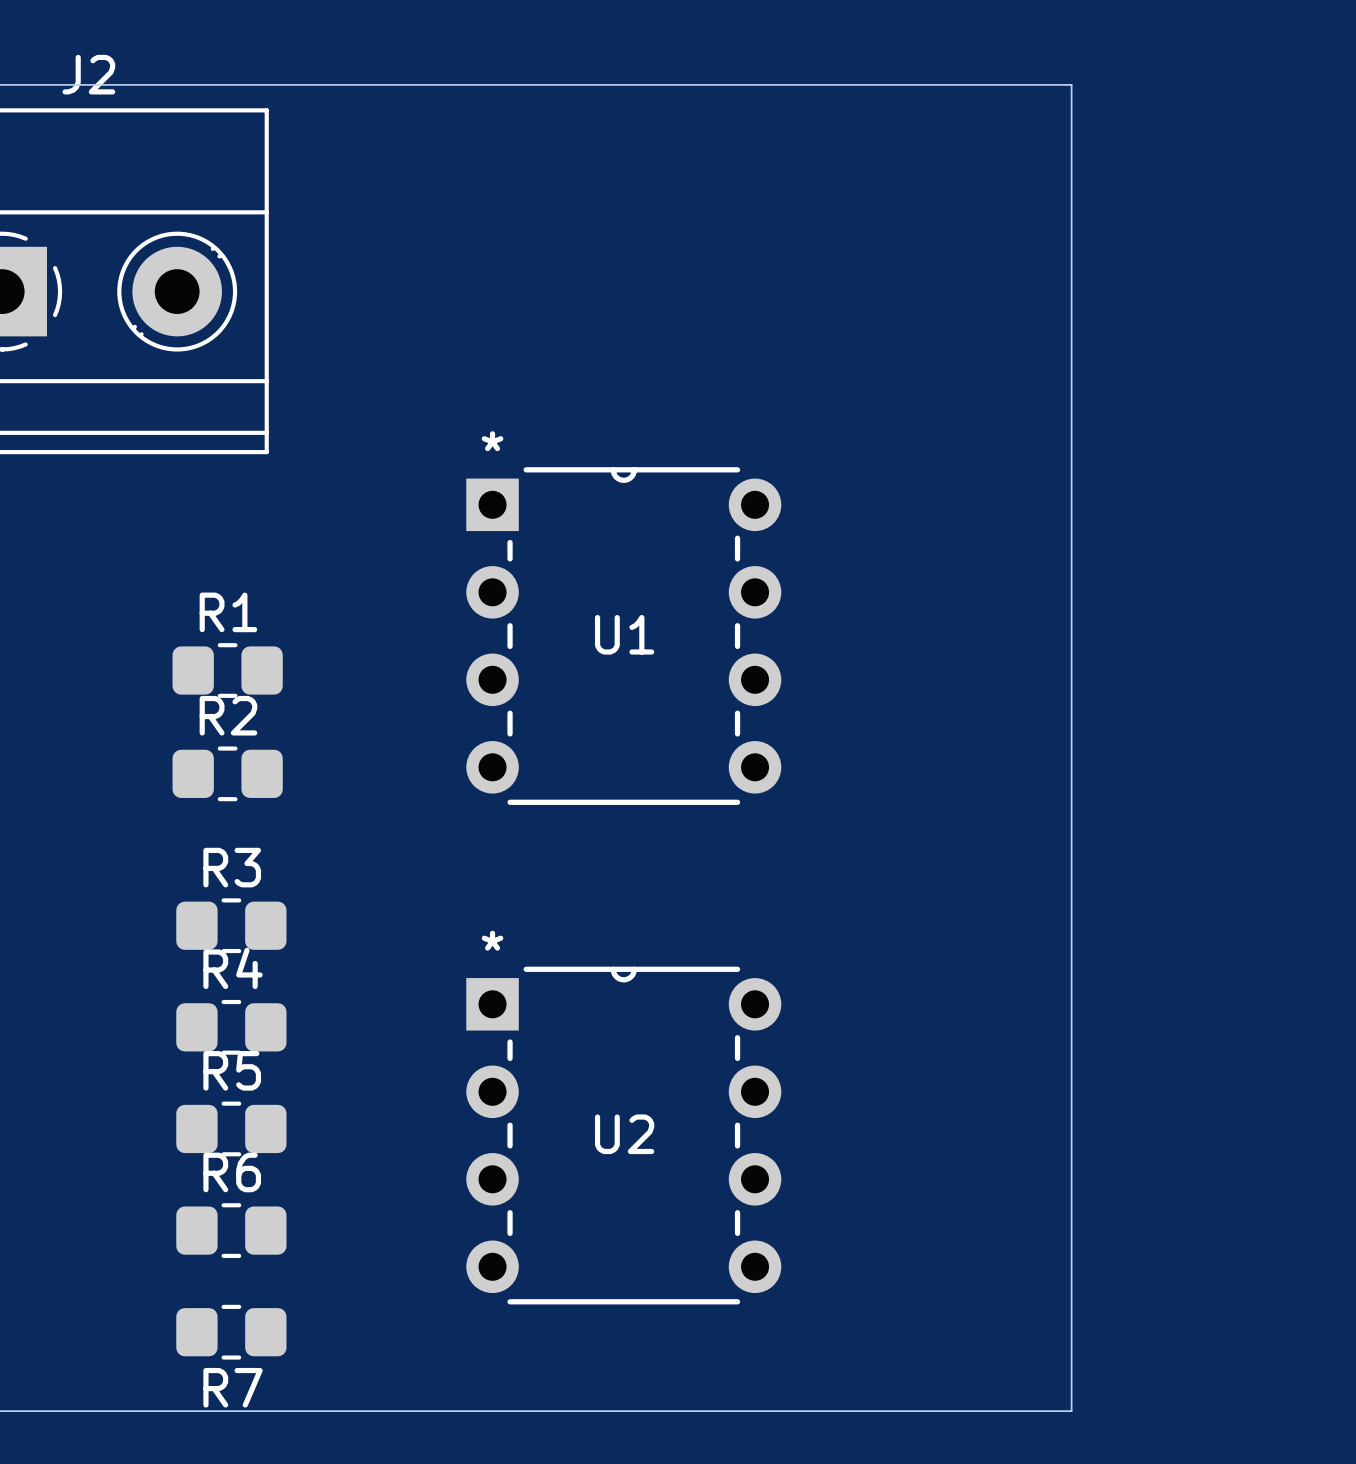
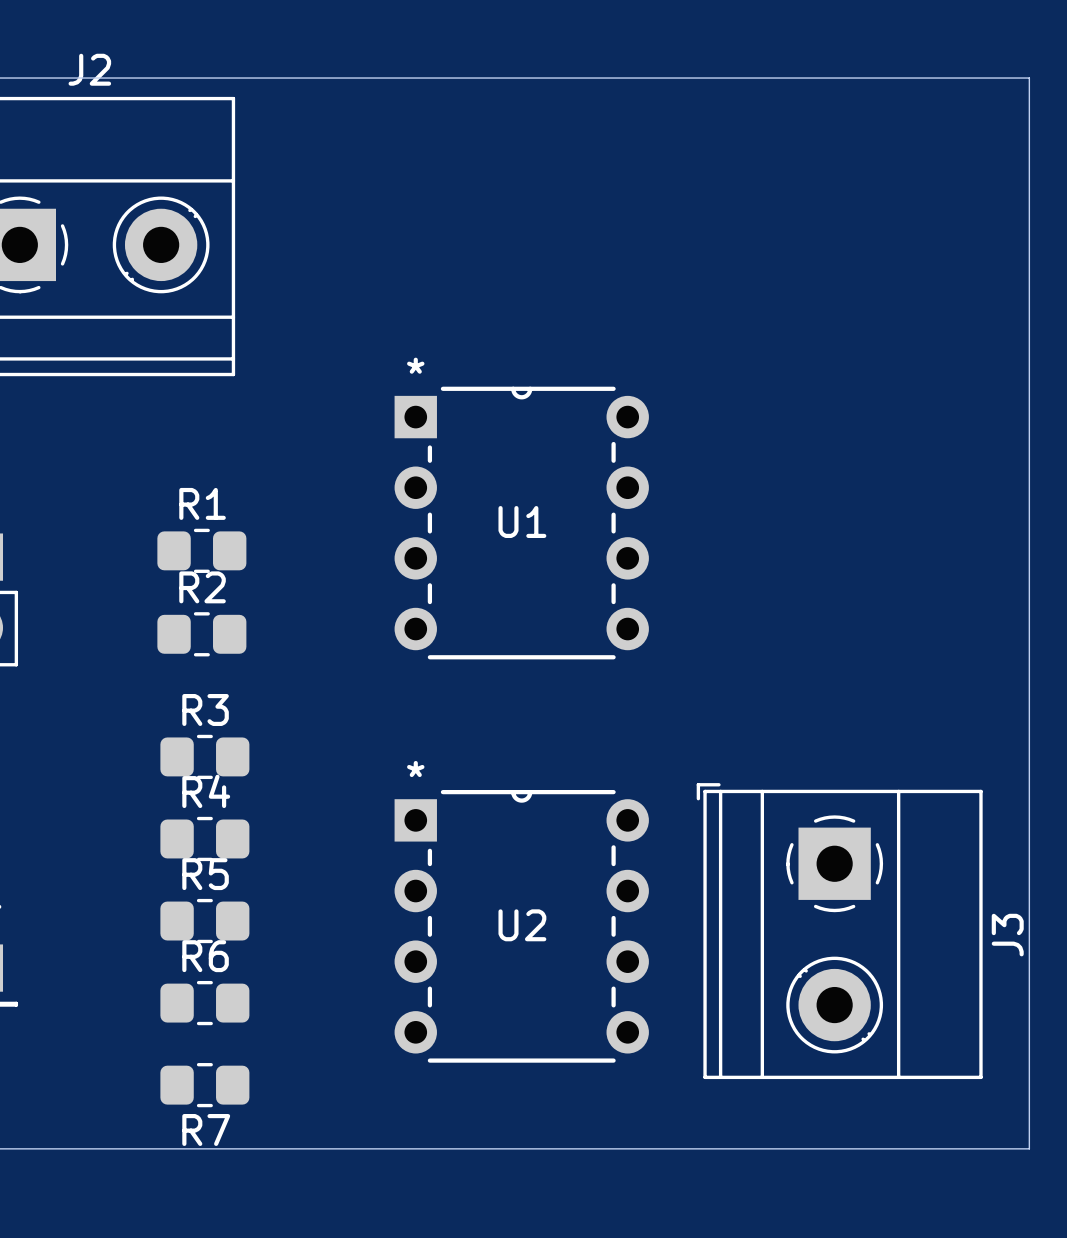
board edge: (1071, 84) (1071, 1411) -> (883, 78) (1029, 78) (1029, 1148) (883, 1148)
J3: none -> (839, 931)

